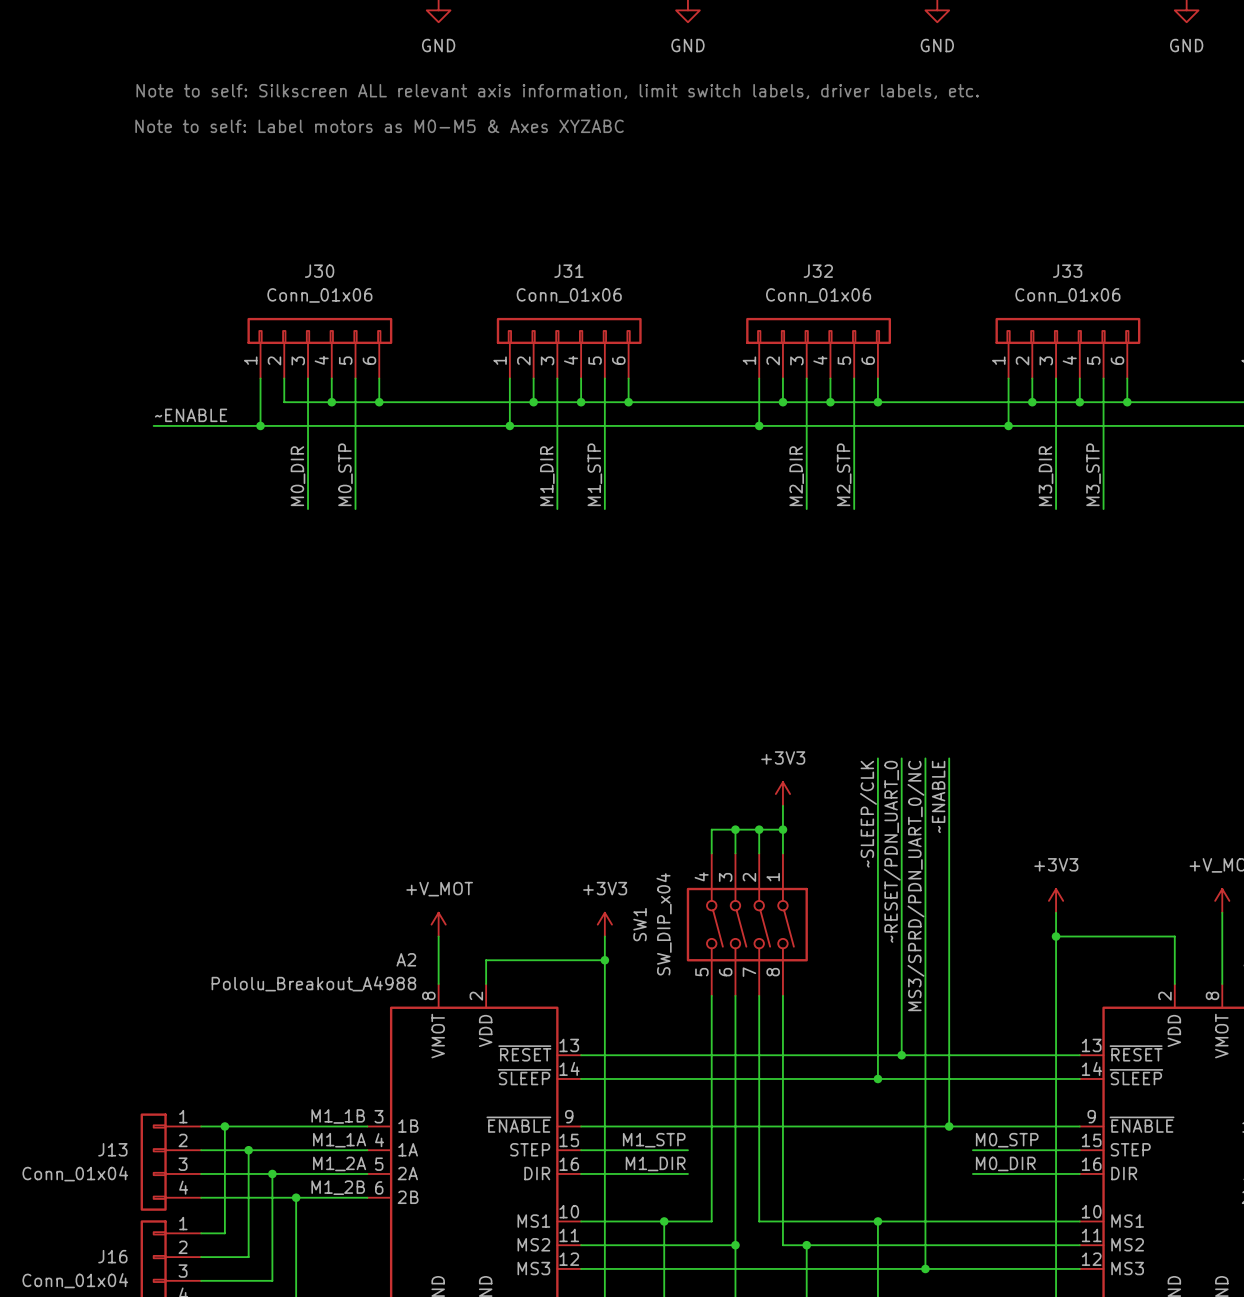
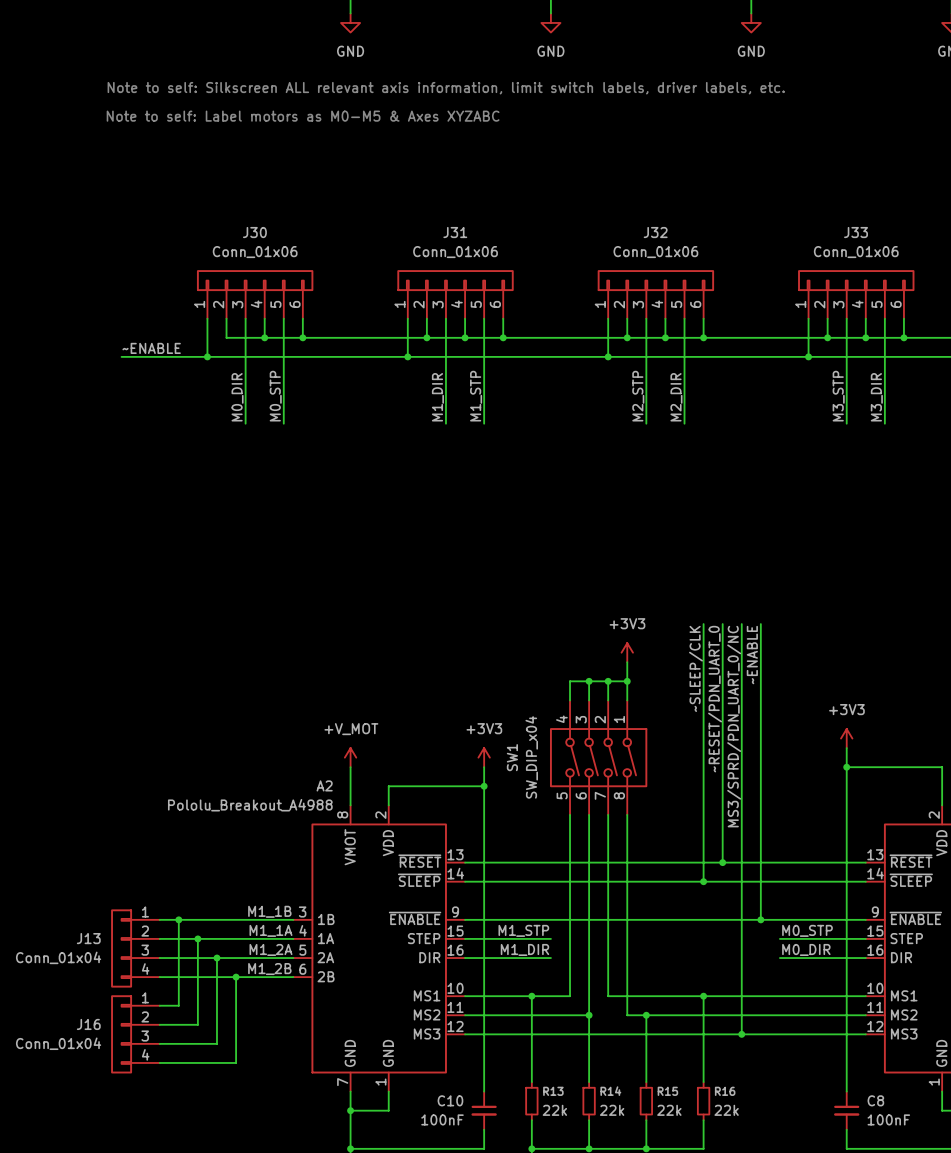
label: M2_STP (844, 474) -> M2_DIR (676, 397)
label: M3_STP (1093, 474) -> M3_DIR (876, 397)
label: M2_DIR (796, 476) -> M2_STP (638, 396)
label: M3_DIR (1046, 476) -> M3_STP (838, 396)

